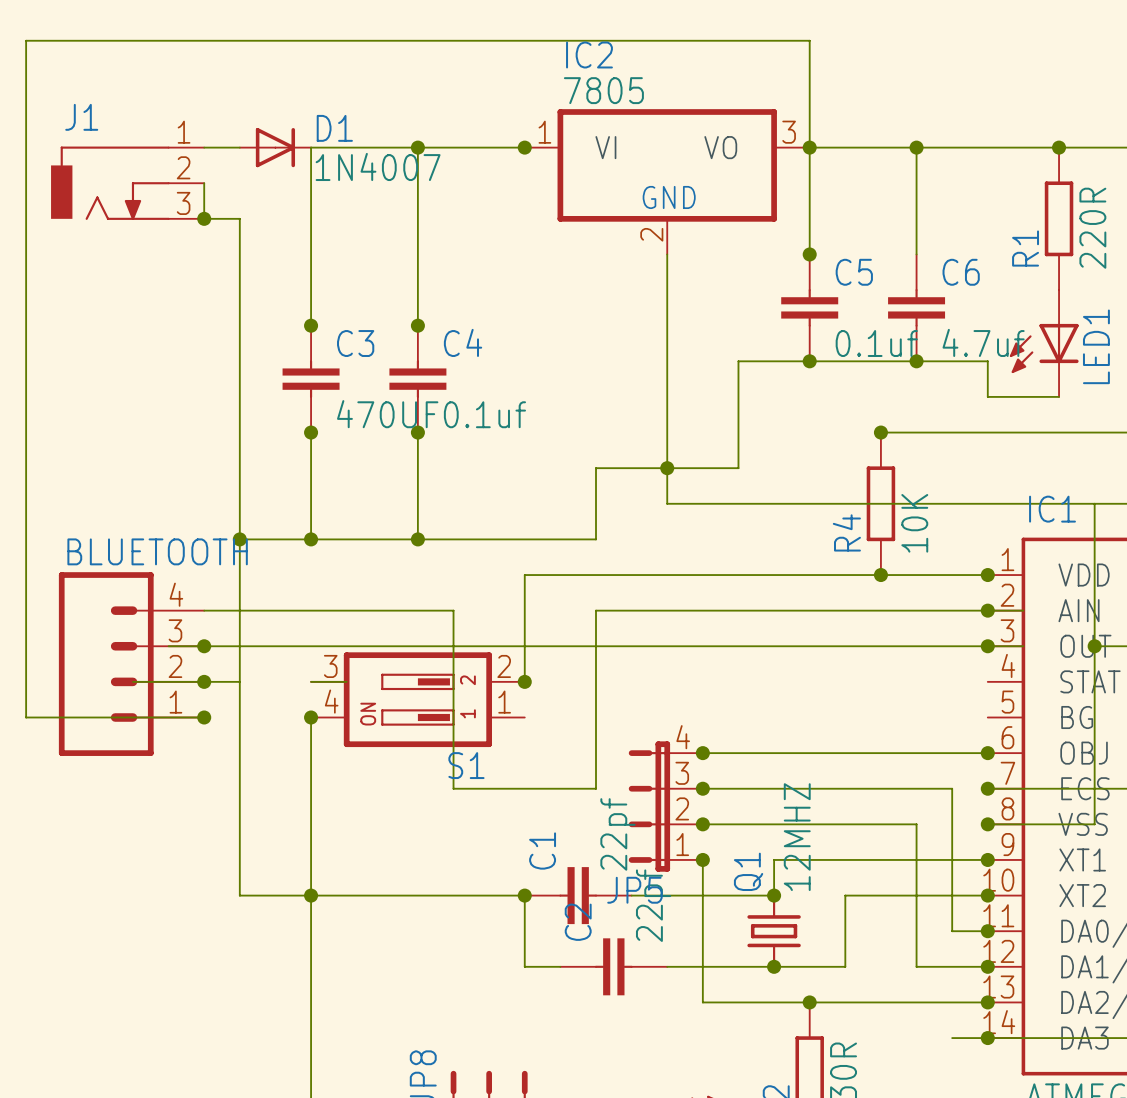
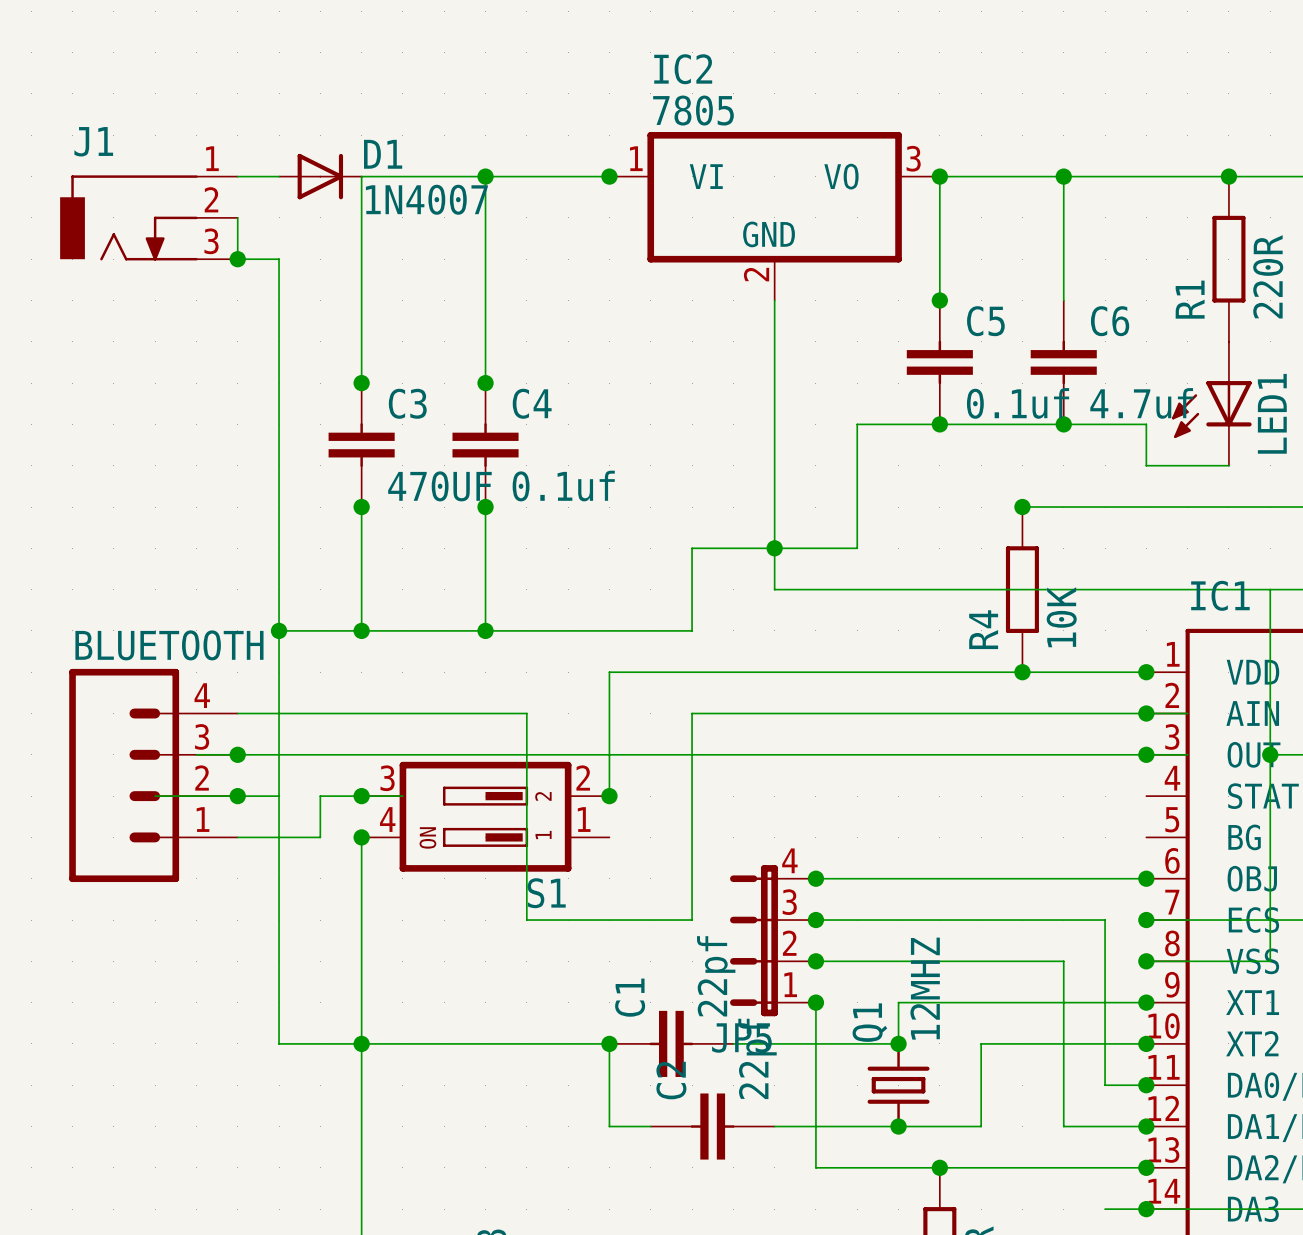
wire: (809, 147) (809, 40) (26, 40) (26, 717) (204, 717) -> (361, 796) (320, 796) (320, 837) (237, 837)
junction: none -> (361, 796)
junction: (204, 717) -> none

